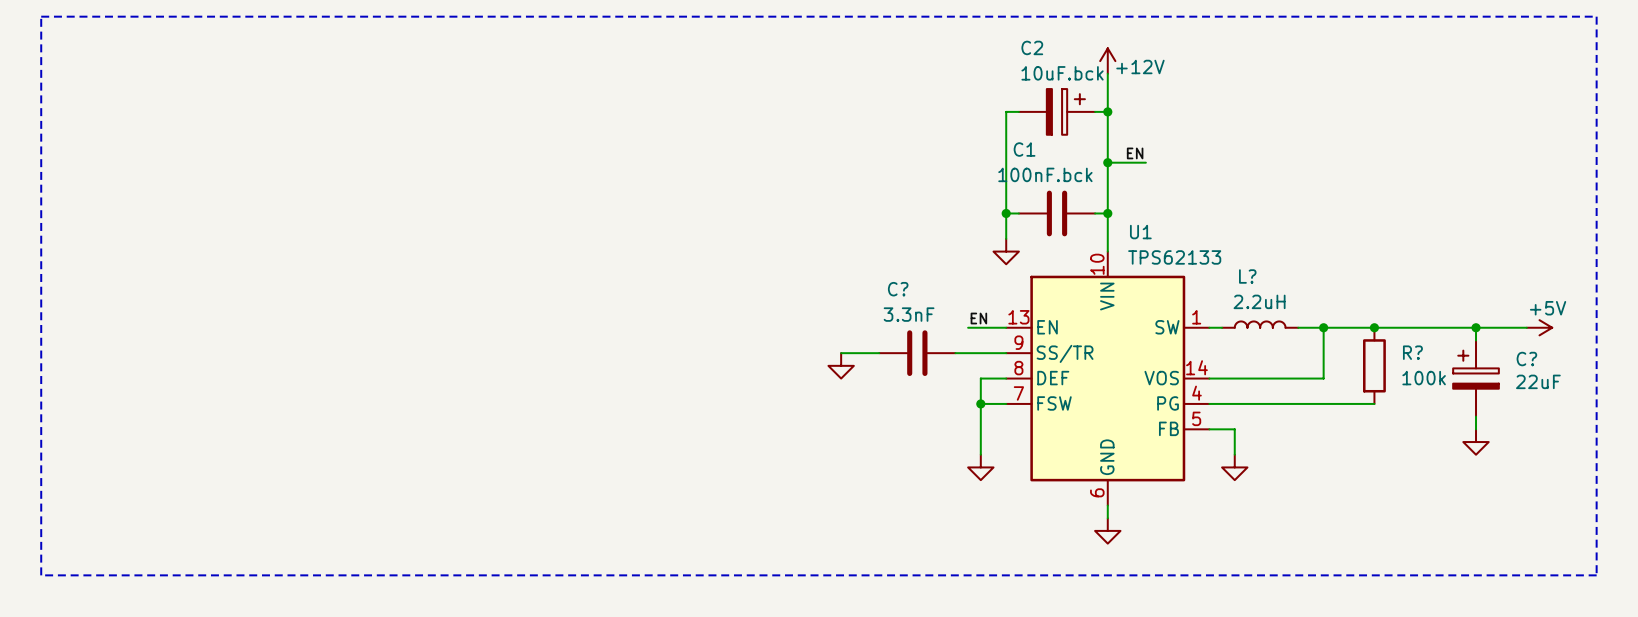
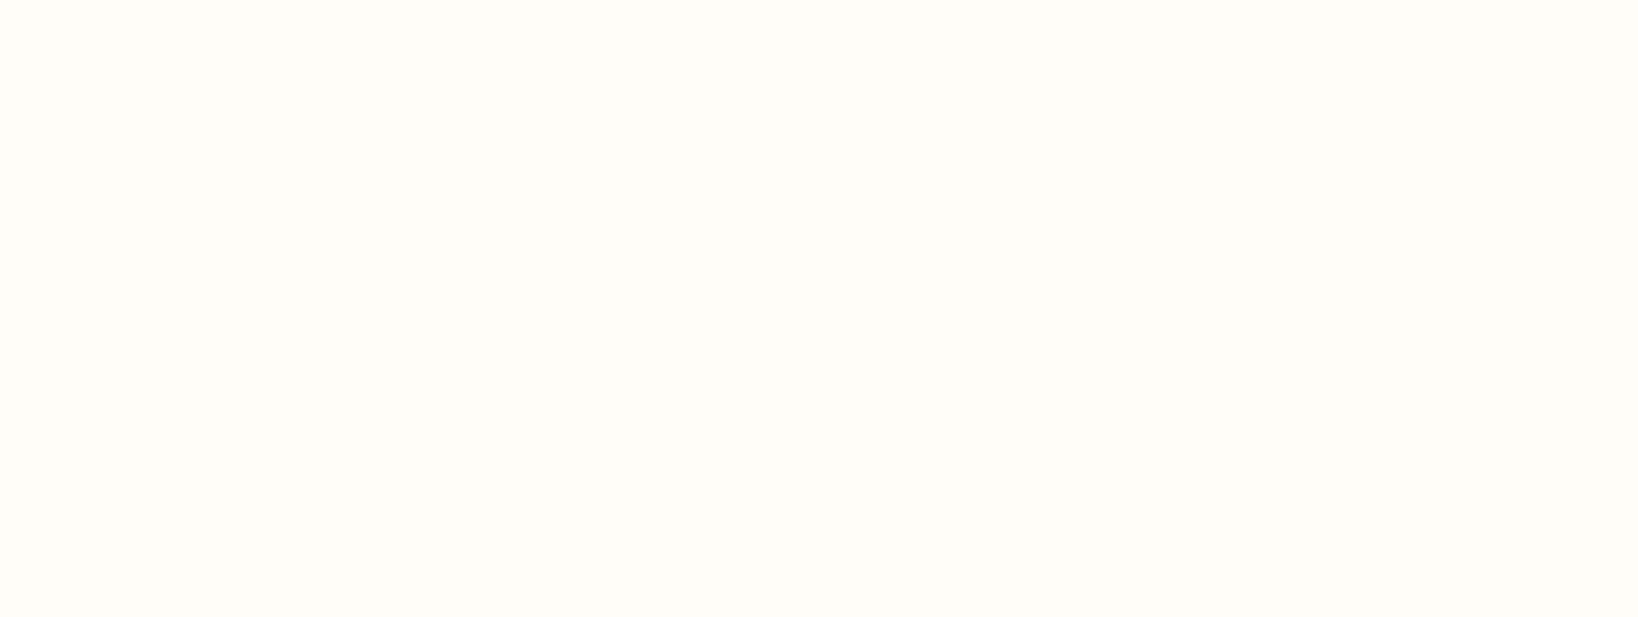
line: (41, 16) (1596, 16) (1596, 575) (41, 575) (41, 16) -> none
power symbol: +12V (1107, 61) -> none
wire: (1107, 73) (1107, 251) -> none
wire: (1018, 111) (1006, 111) (1006, 238) -> none
C2: 10uF.bck (1057, 111) -> none
wire: (1095, 111) (1107, 111) -> none
junction: (1107, 111) -> none
label: EN (1135, 153) -> none
wire: (1107, 162) (1145, 162) -> none
junction: (1107, 162) -> none
wire: (1006, 213) (1018, 213) -> none
junction: (1006, 213) -> none
C1: 100nF.bck (1057, 213) -> none
wire: (1095, 213) (1107, 213) -> none
junction: (1107, 213) -> none
power symbol: (1006, 251) -> none
label: EN (978, 318) -> none
L?: 2.2uH (1260, 324) -> none
wire: (968, 327) (1006, 327) -> none
wire: (1209, 327) (1222, 327) -> none
wire: (1298, 327) (1526, 327) -> none
wire: (1323, 327) (1323, 378) (1209, 378) -> none
junction: (1323, 327) -> none
junction: (1374, 327) -> none
wire: (1476, 327) (1476, 340) -> none
junction: (1476, 327) -> none
power symbol: +5V (1539, 327) -> none
wire: (841, 353) (879, 353) -> none
C?: 3.3nF (917, 353) -> none
wire: (955, 353) (1006, 353) -> none
power symbol: (841, 365) -> none
R?: 100k (1374, 365) -> none
wire: (1006, 378) (980, 378) (980, 454) -> none
U1: TPS62133 (1107, 378) -> none
C?: 22uF (1476, 378) -> none
wire: (980, 403) (1006, 403) -> none
junction: (980, 403) -> none
wire: (1209, 403) (1374, 403) -> none
wire: (1476, 416) (1476, 429) -> none
wire: (1209, 429) (1234, 429) (1234, 454) -> none
power symbol: (1476, 442) -> none
power symbol: (980, 467) -> none
power symbol: (1234, 467) -> none
wire: (1107, 505) (1107, 518) -> none
power symbol: (1107, 530) -> none

